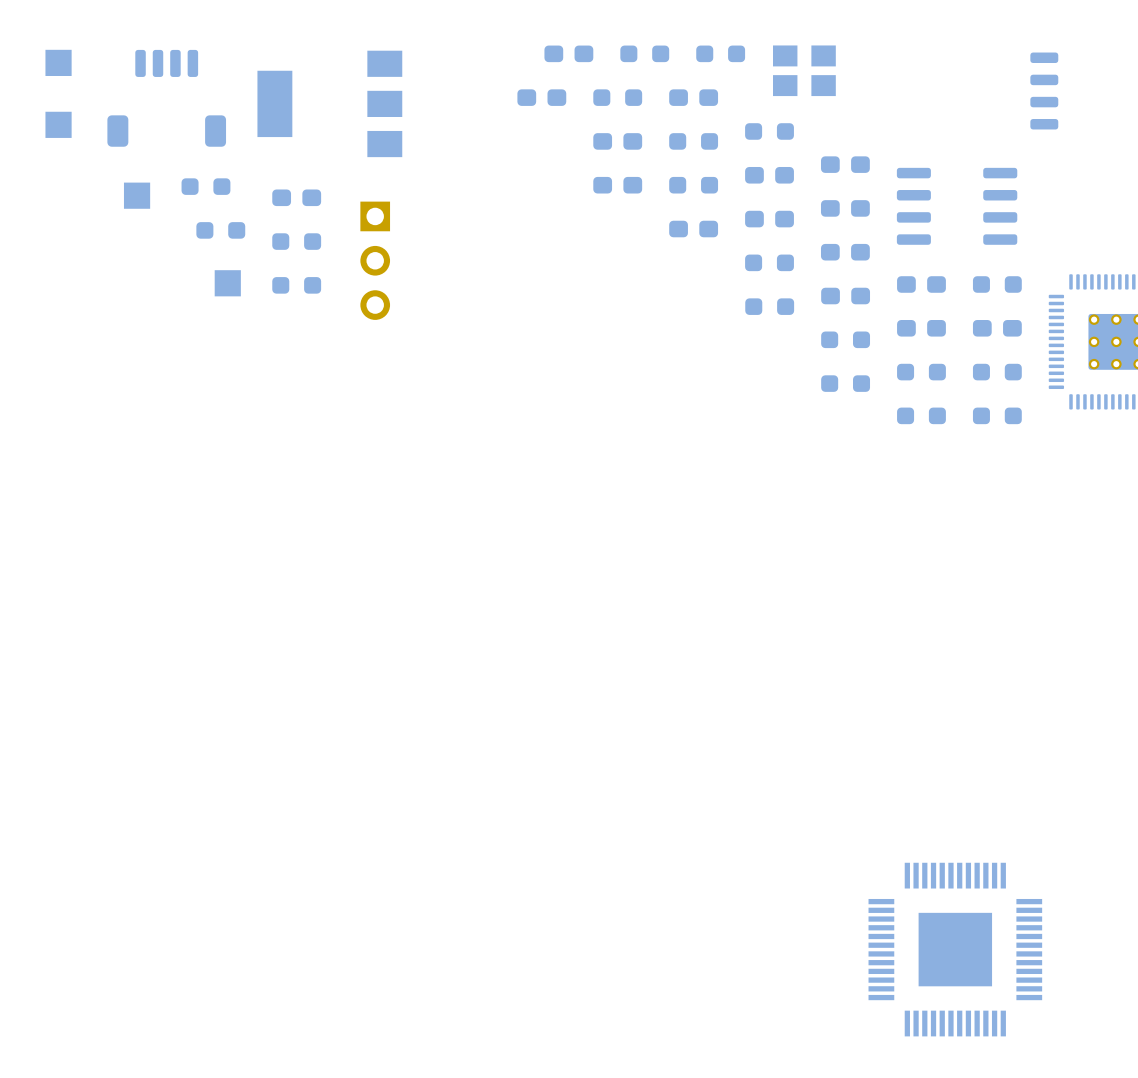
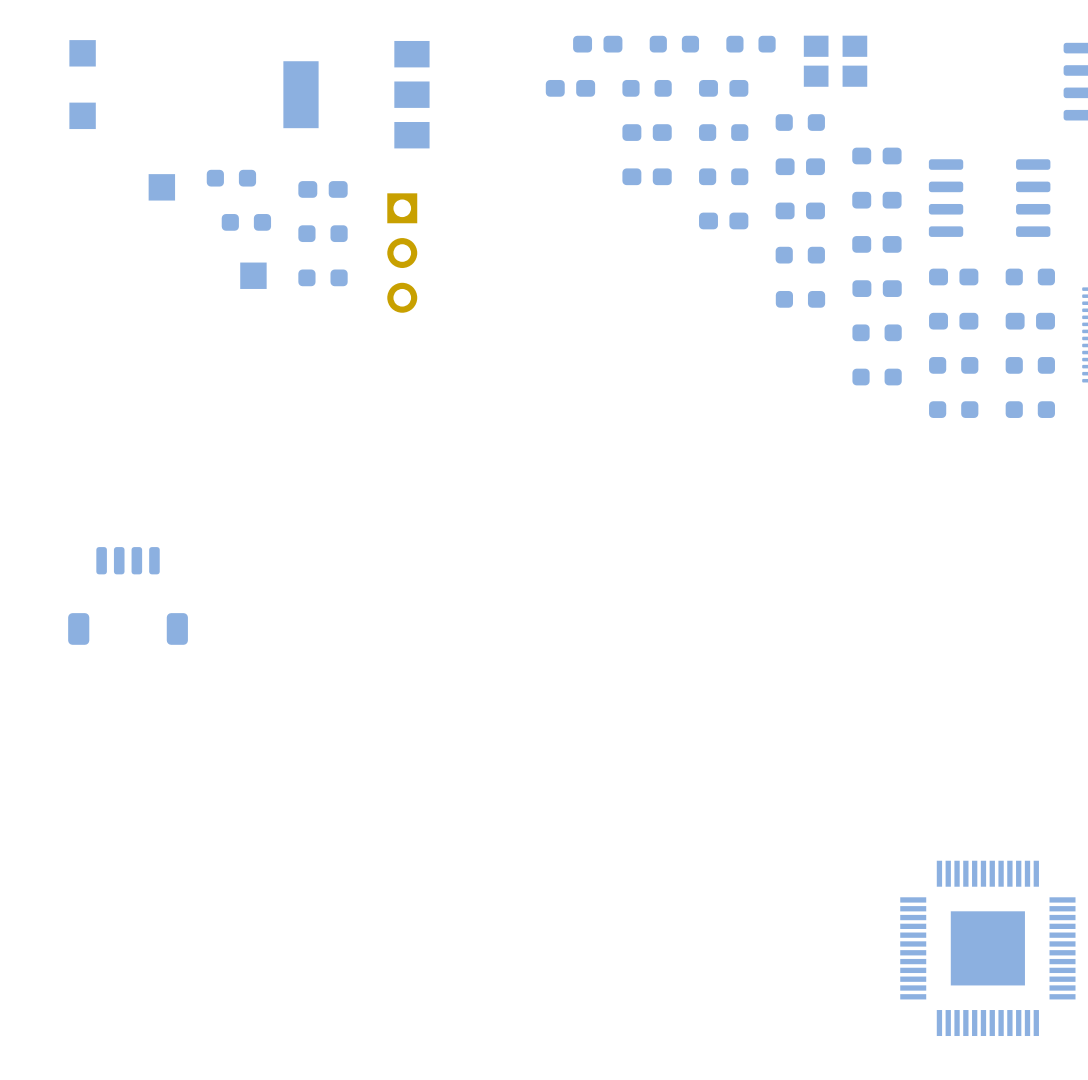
part: (166, 98) -> none
part: none -> (128, 595)

